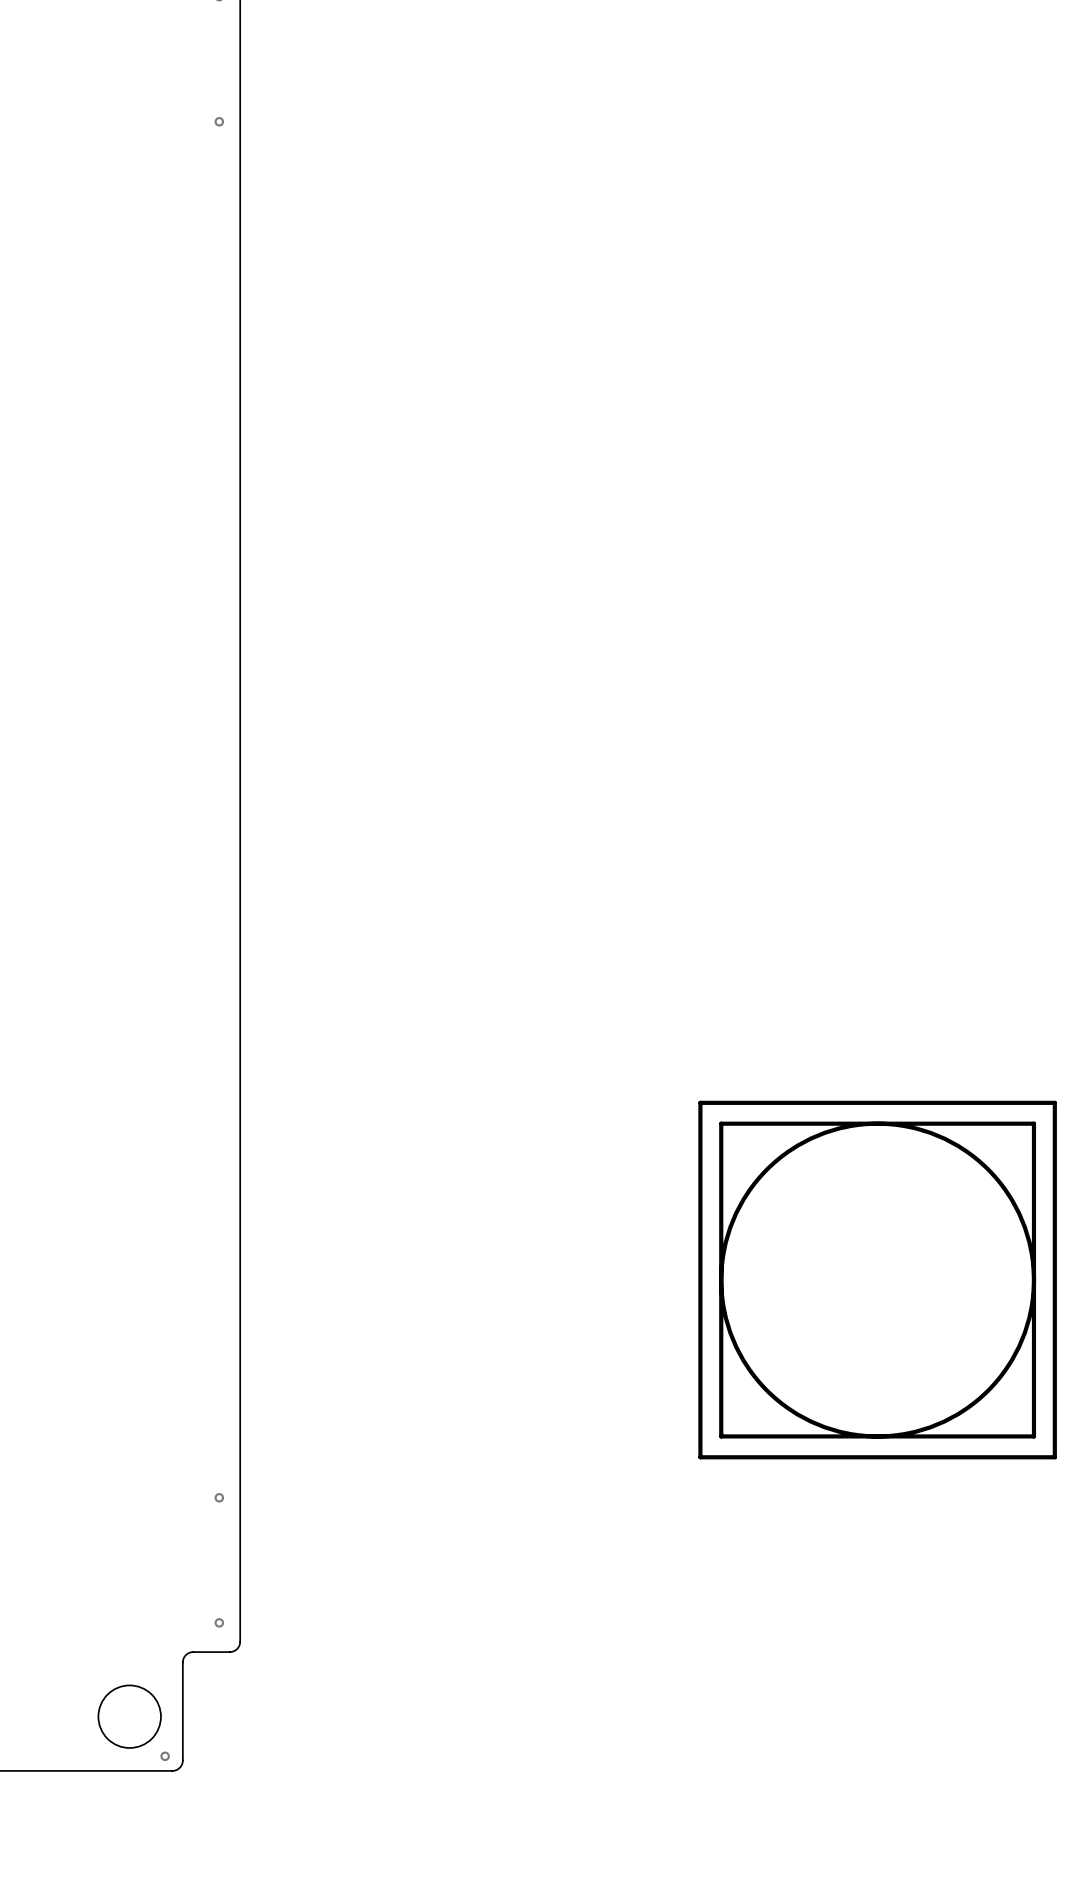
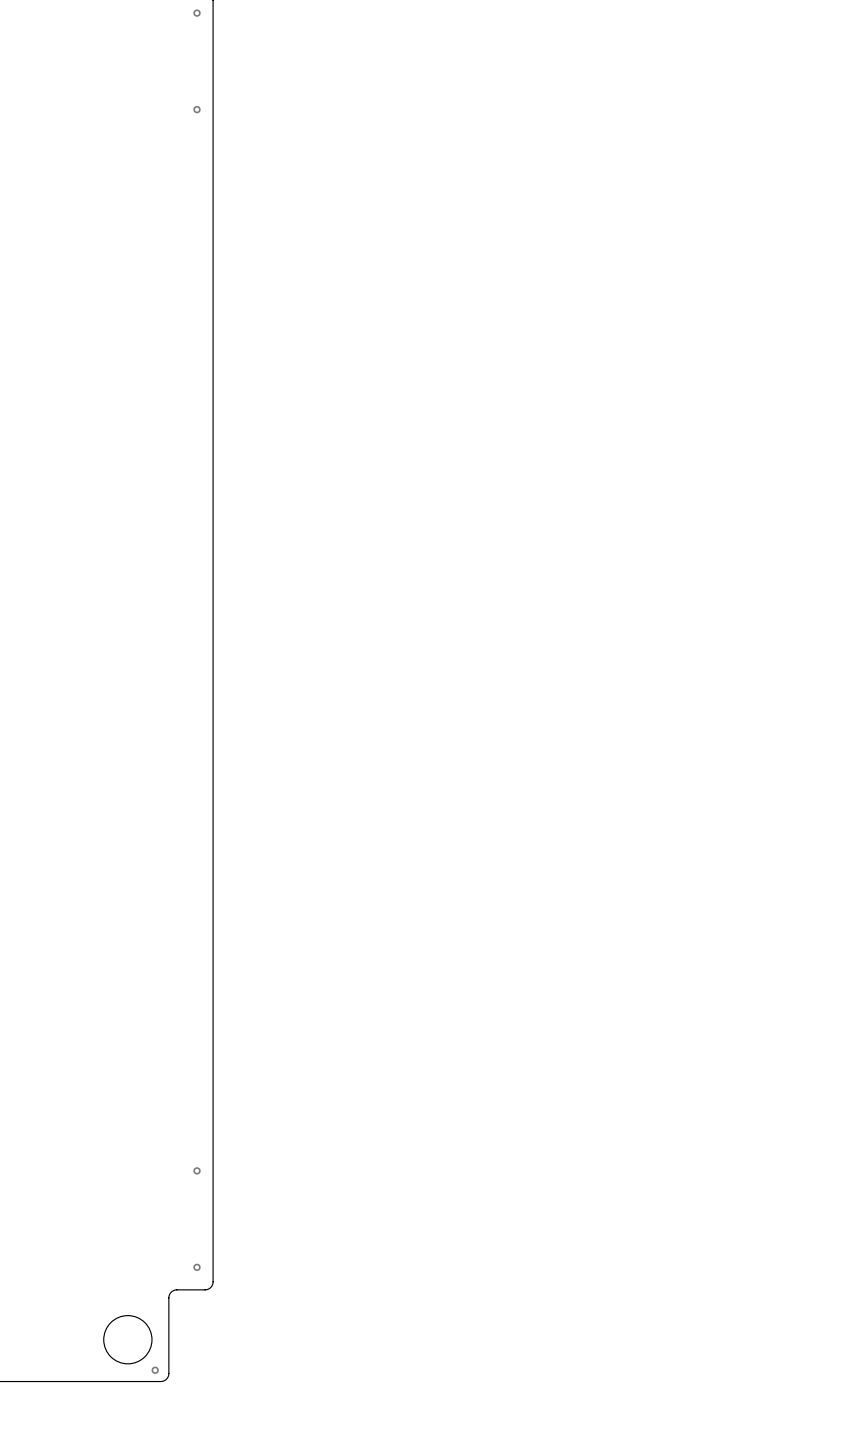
line: (700, 1102) (1054, 1102) (1054, 1457) (700, 1457) (700, 1102) -> none
drawing: [719, 1121, 1037, 1439] -> none
line: (721, 1123) (1033, 1123) (1033, 1436) (721, 1436) (721, 1123) -> none

